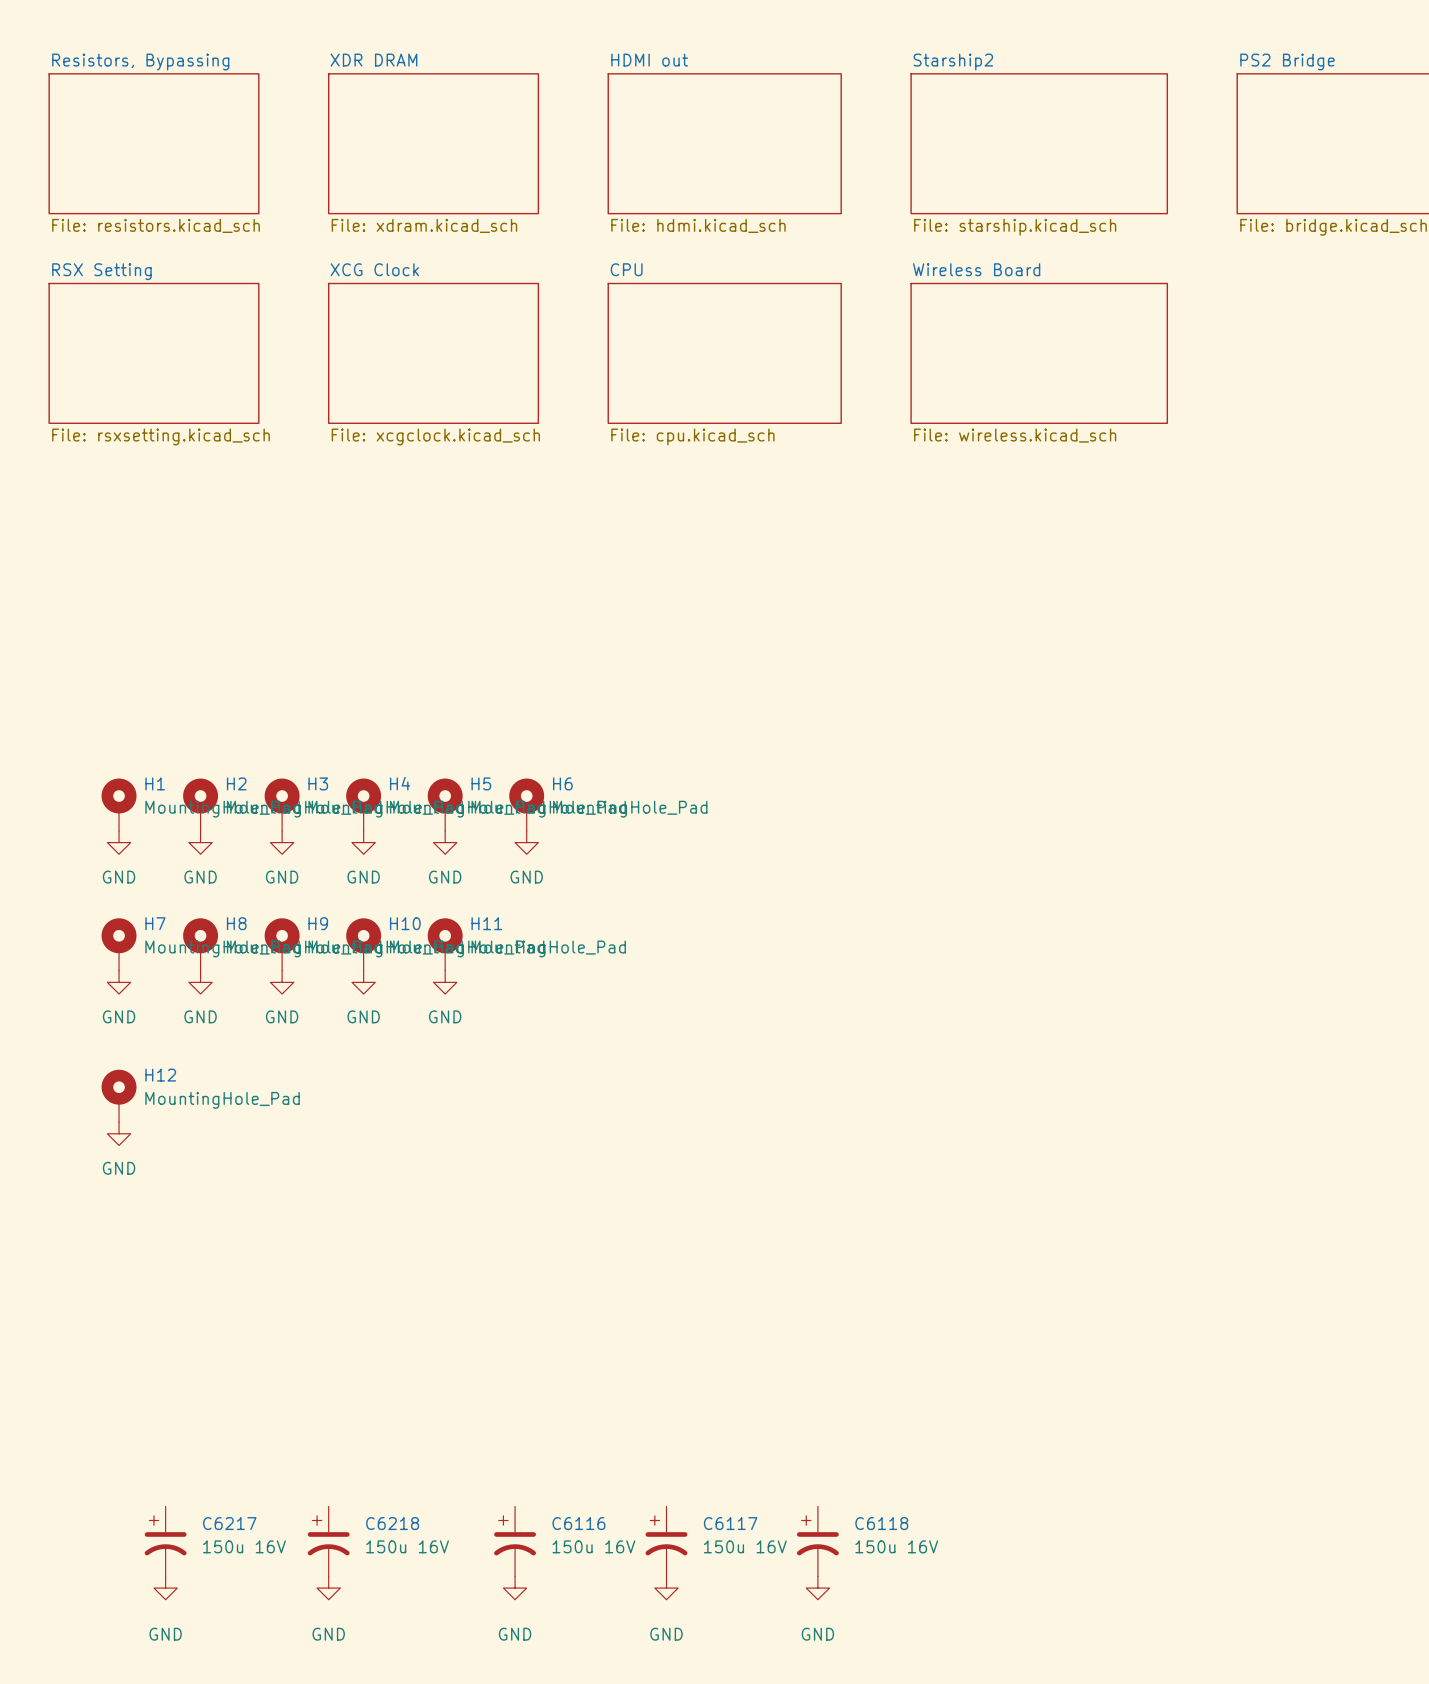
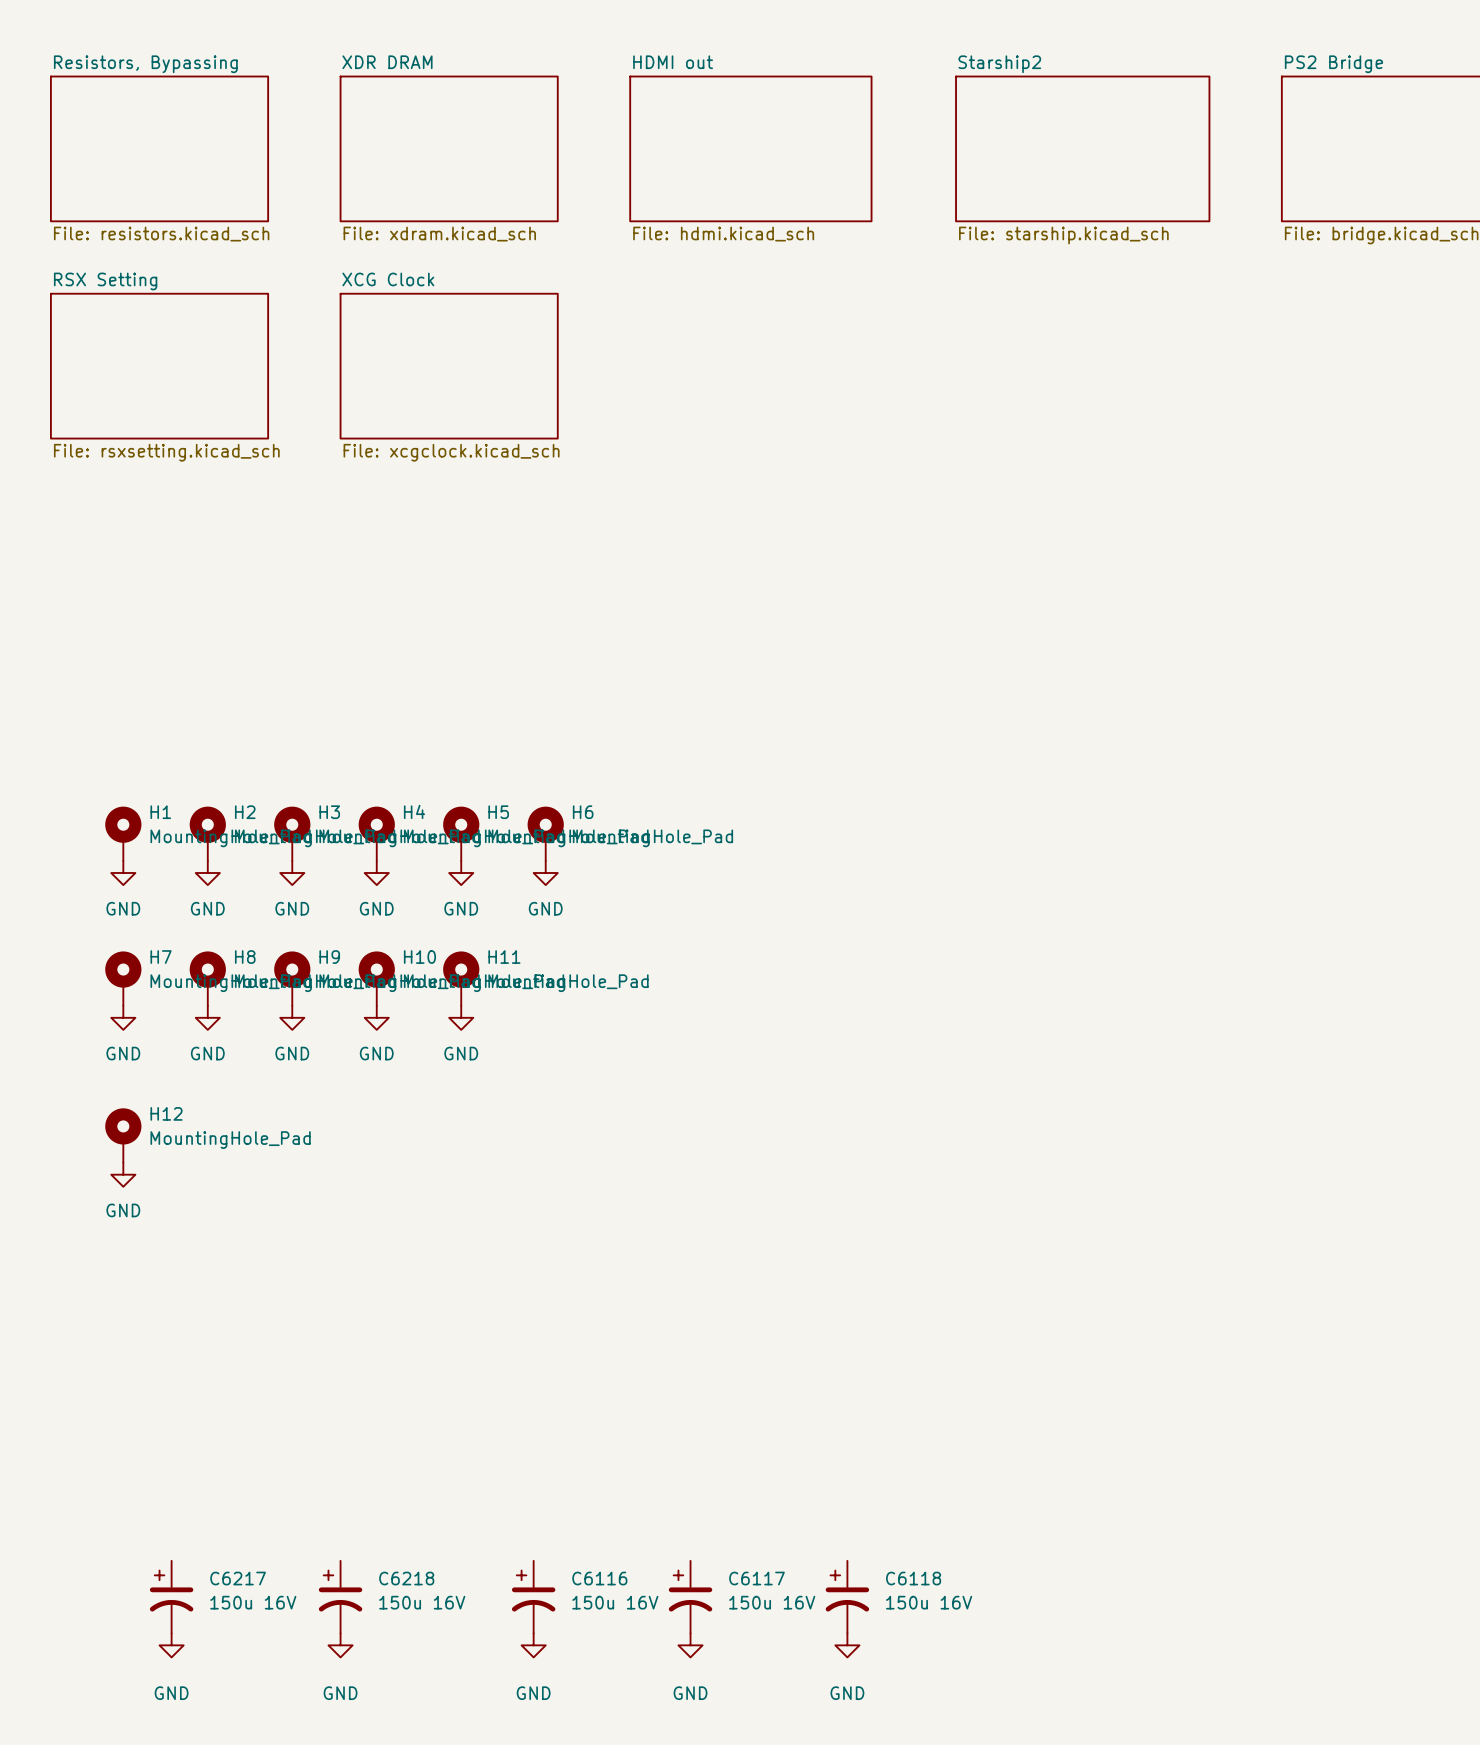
sheet Starship2 shape: [910, 73, 1169, 215] -> [955, 75, 1211, 223]
sheet CPU: File: cpu.kicad_sch (724, 353) -> none
sheet Wireless Board: File: wireless.kicad_sch (1039, 353) -> none

